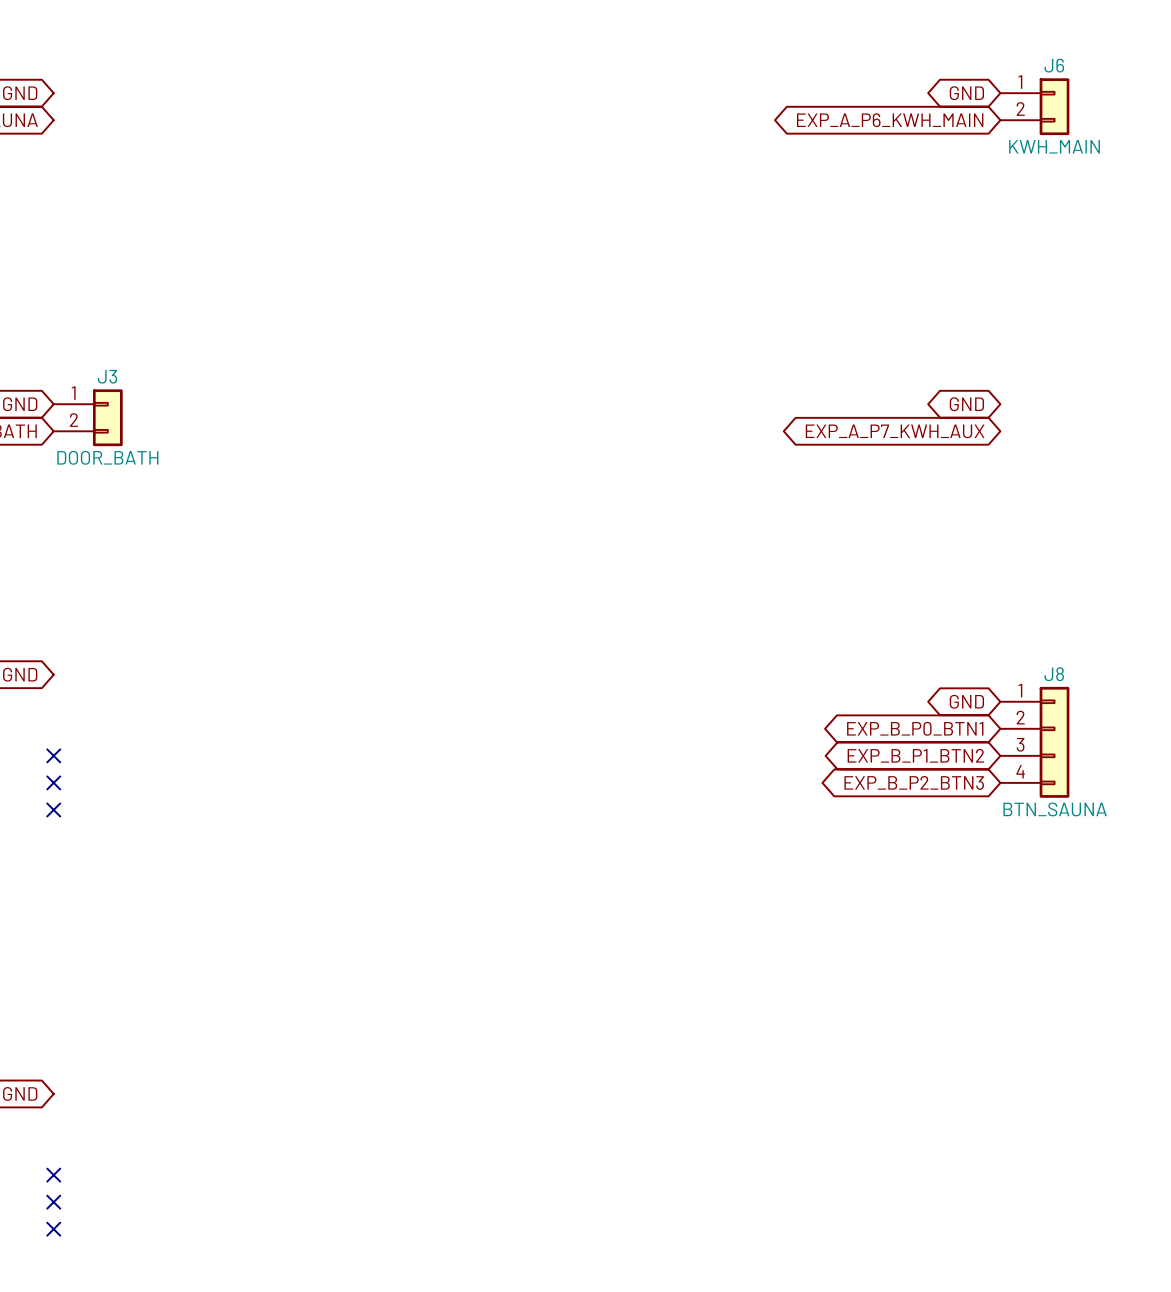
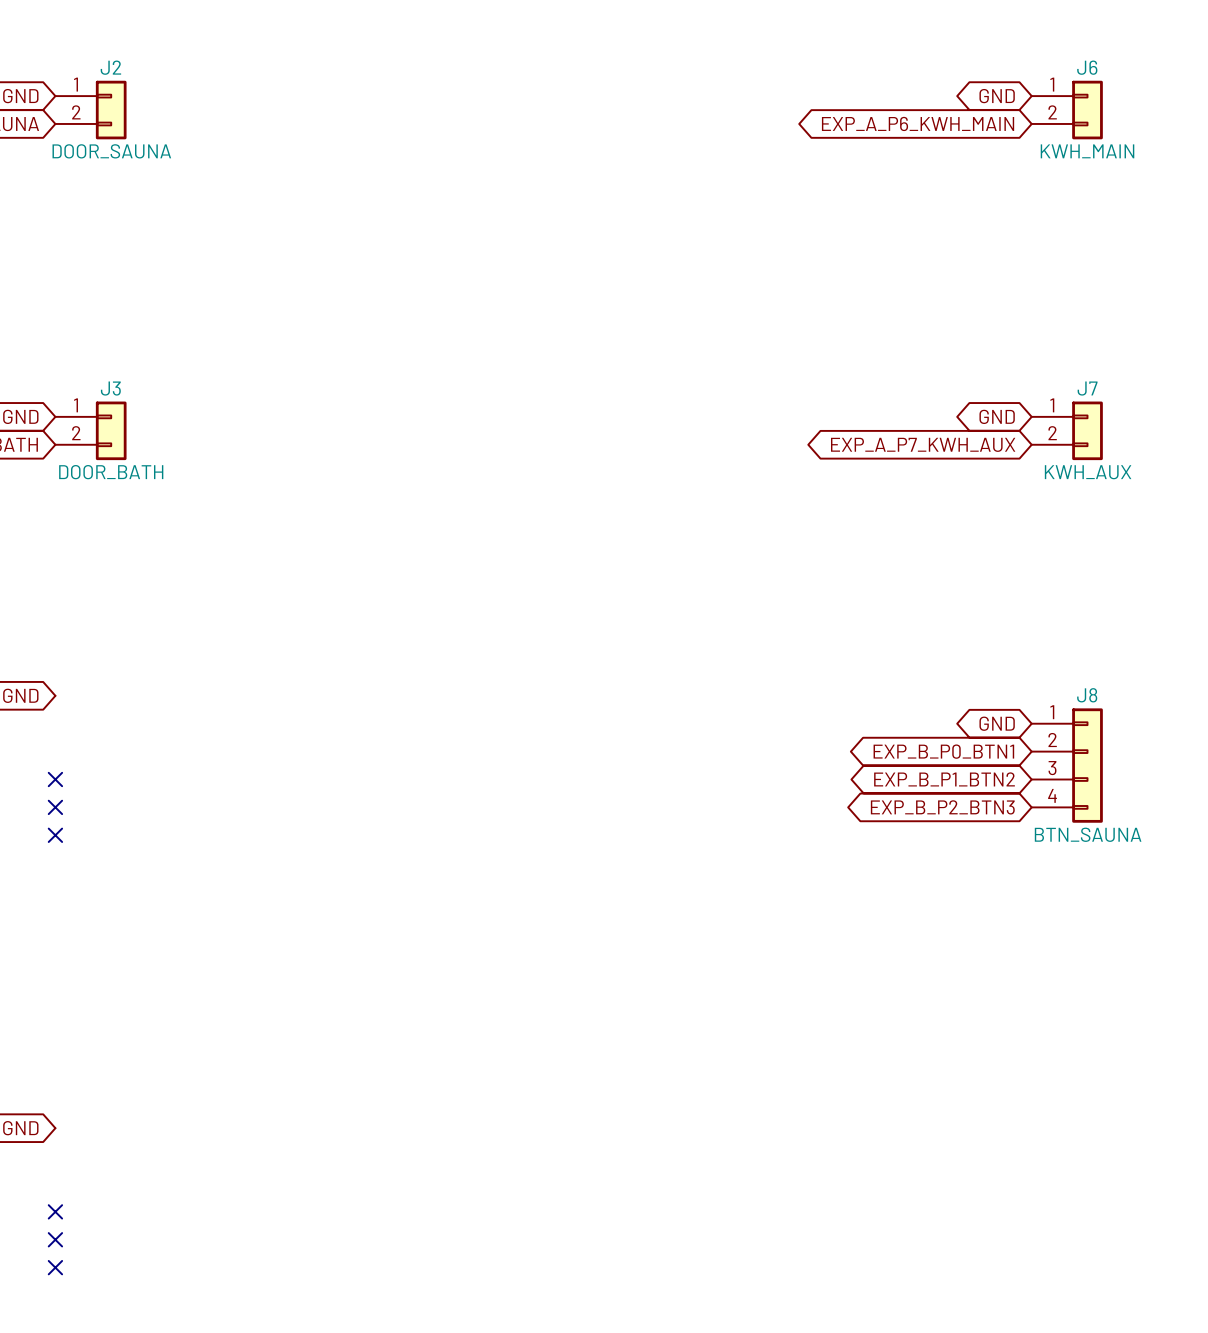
J2: none -> DOOR_SAUNA (90, 110)
J7: none -> KWH_AUX (1067, 430)

